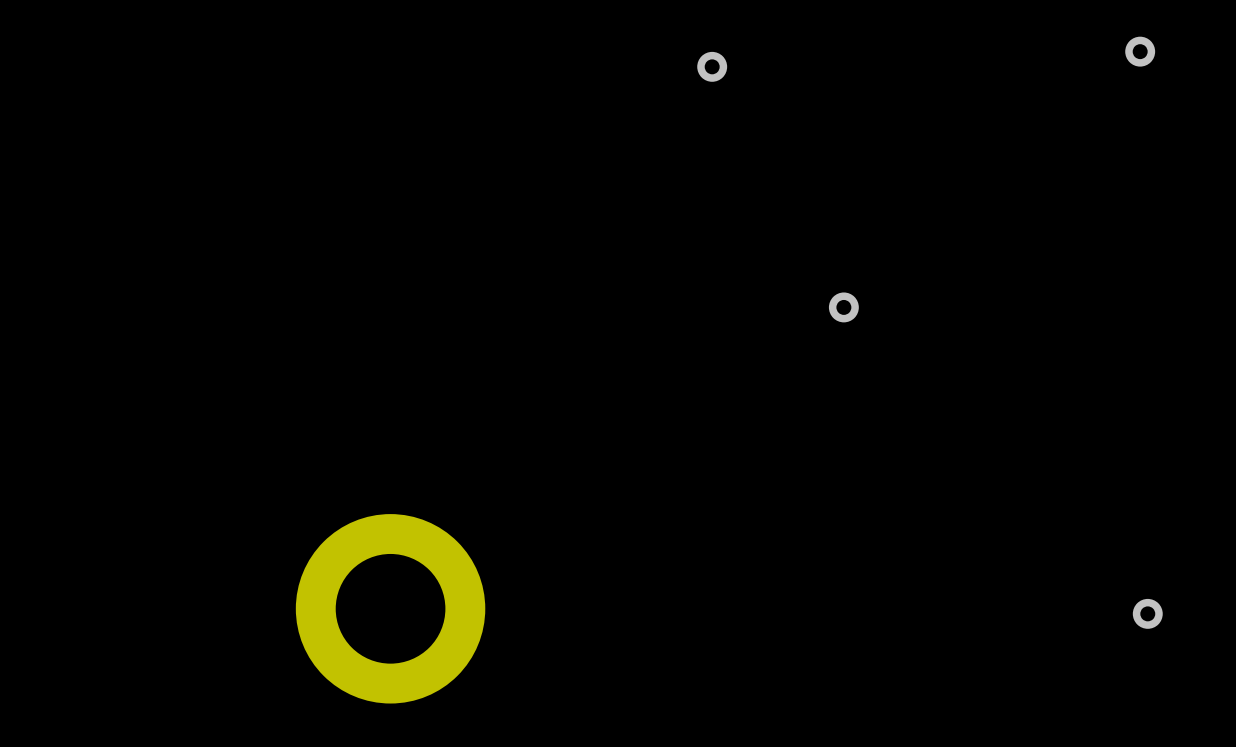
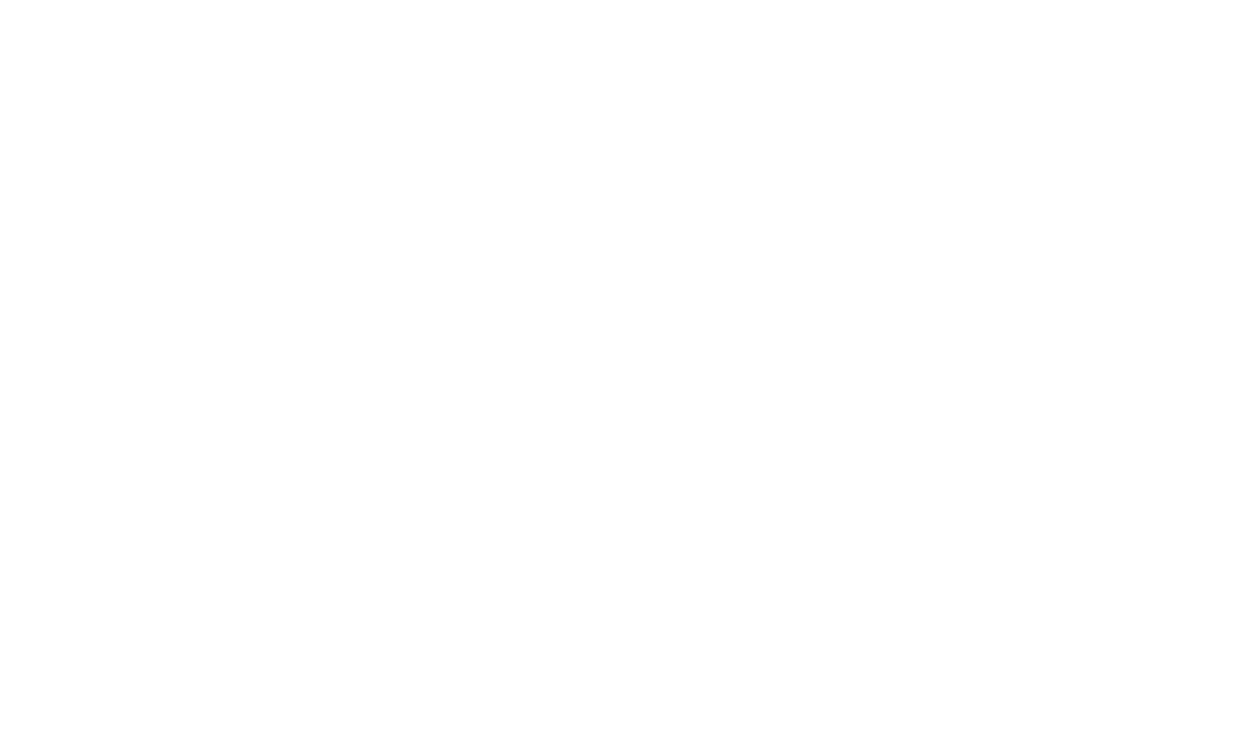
via: (1140, 51) -> none
via: (712, 66) -> none
via: (843, 307) -> none
part: (390, 608) -> none
via: (1147, 613) -> none

